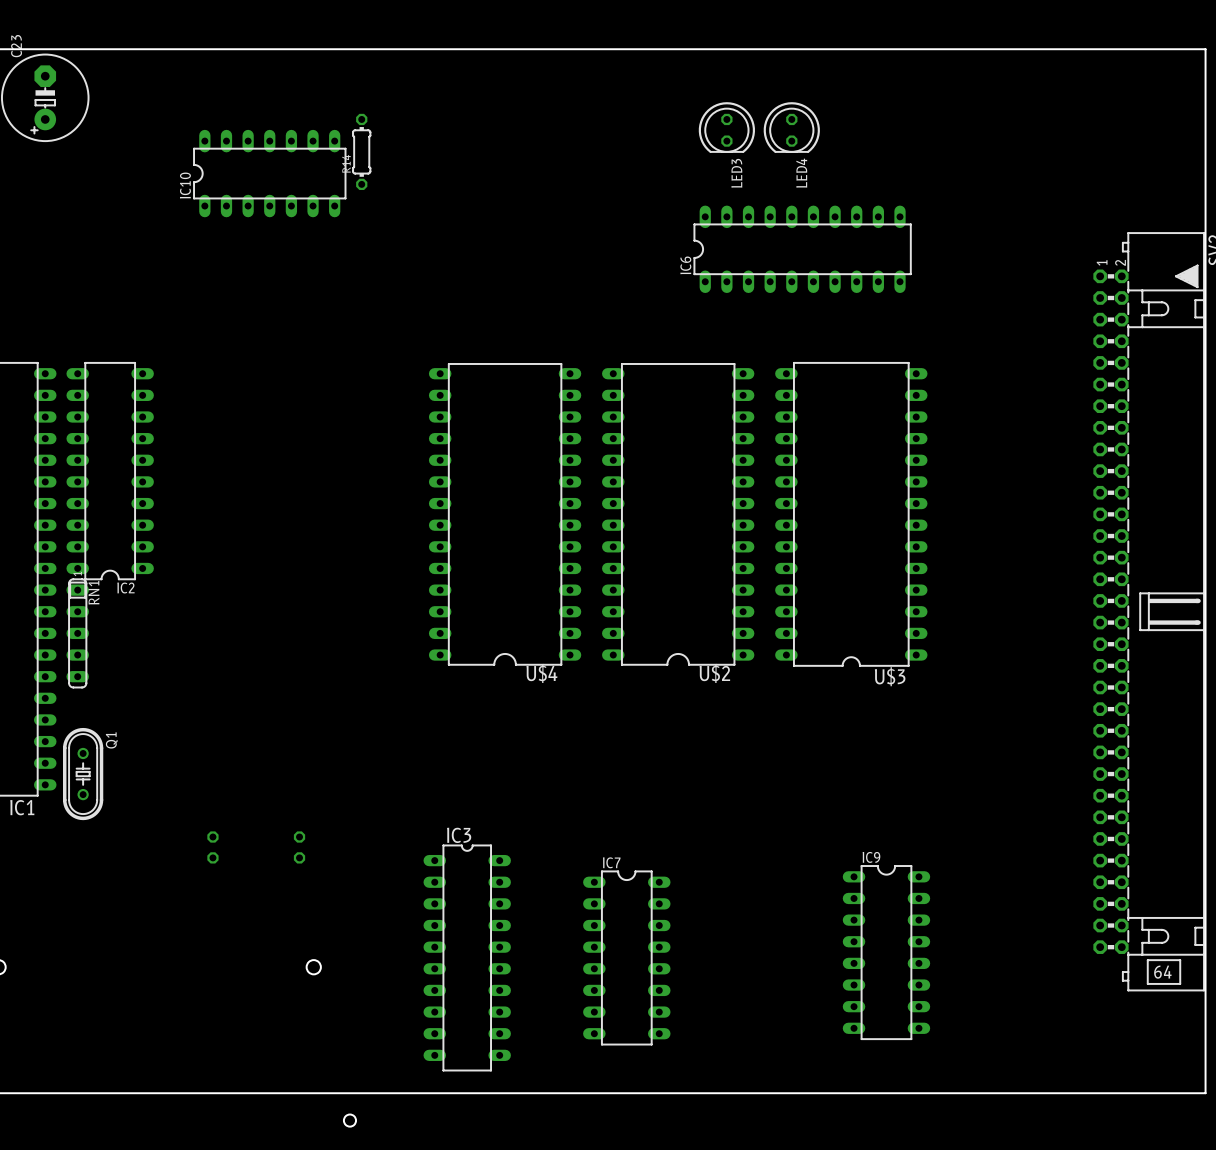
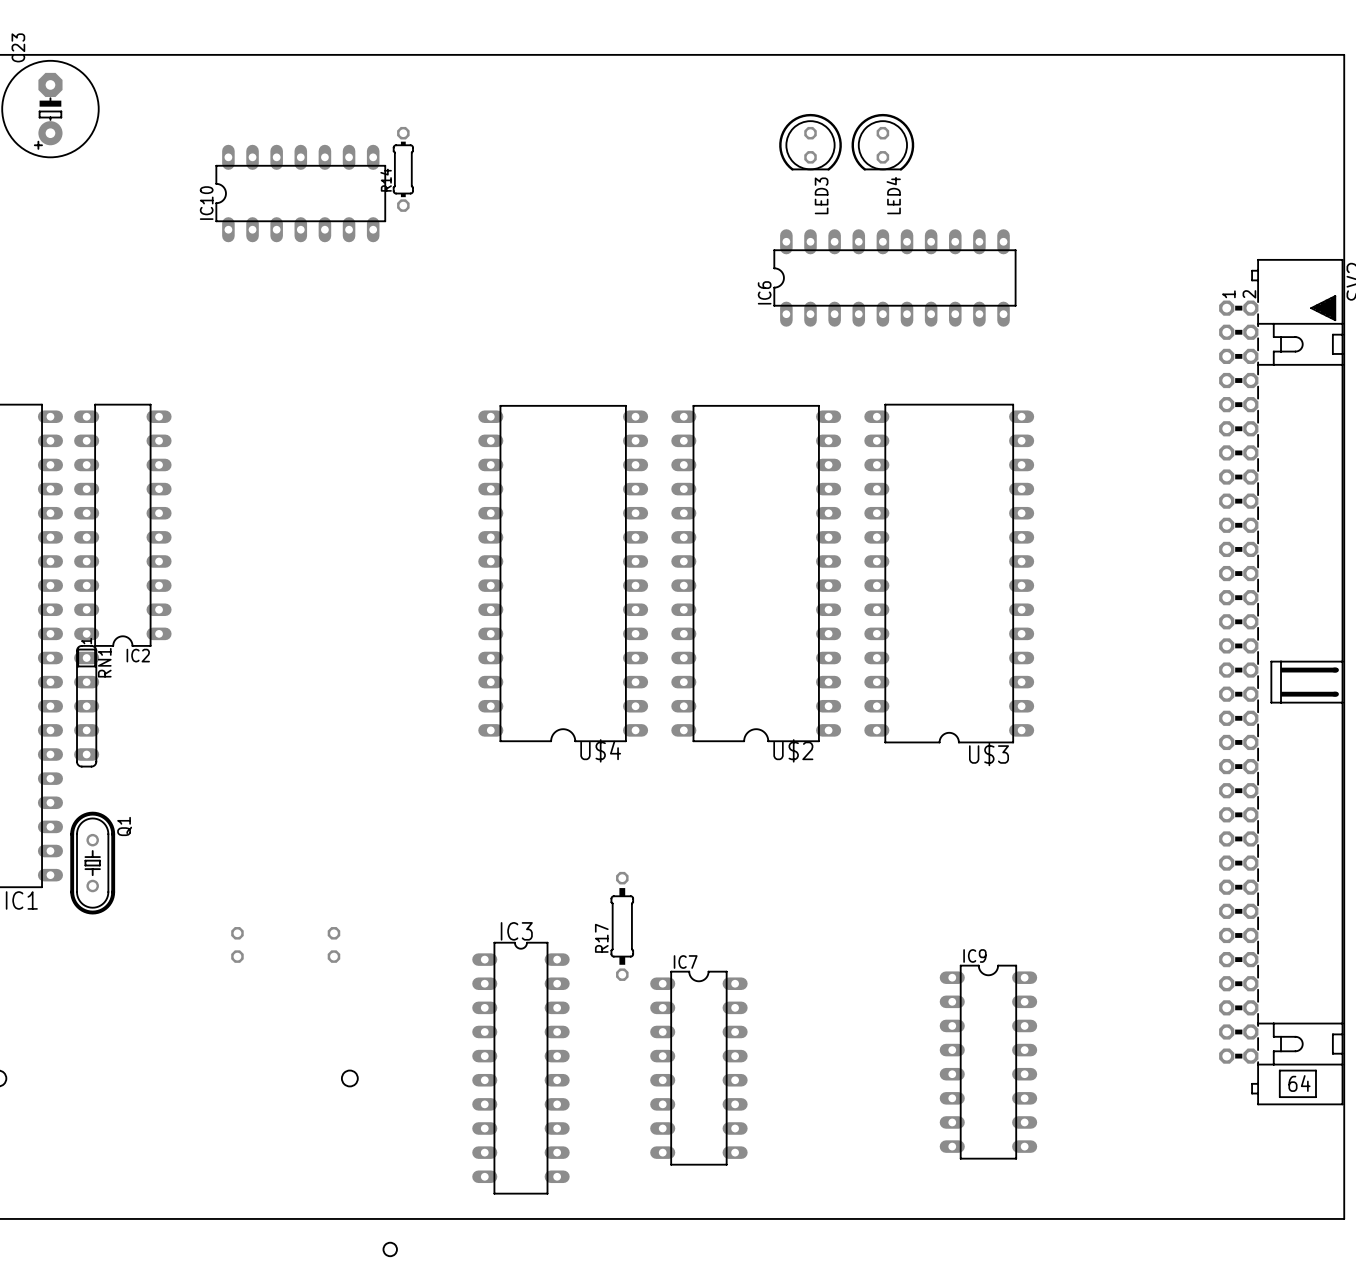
R17: none -> (622, 926)

